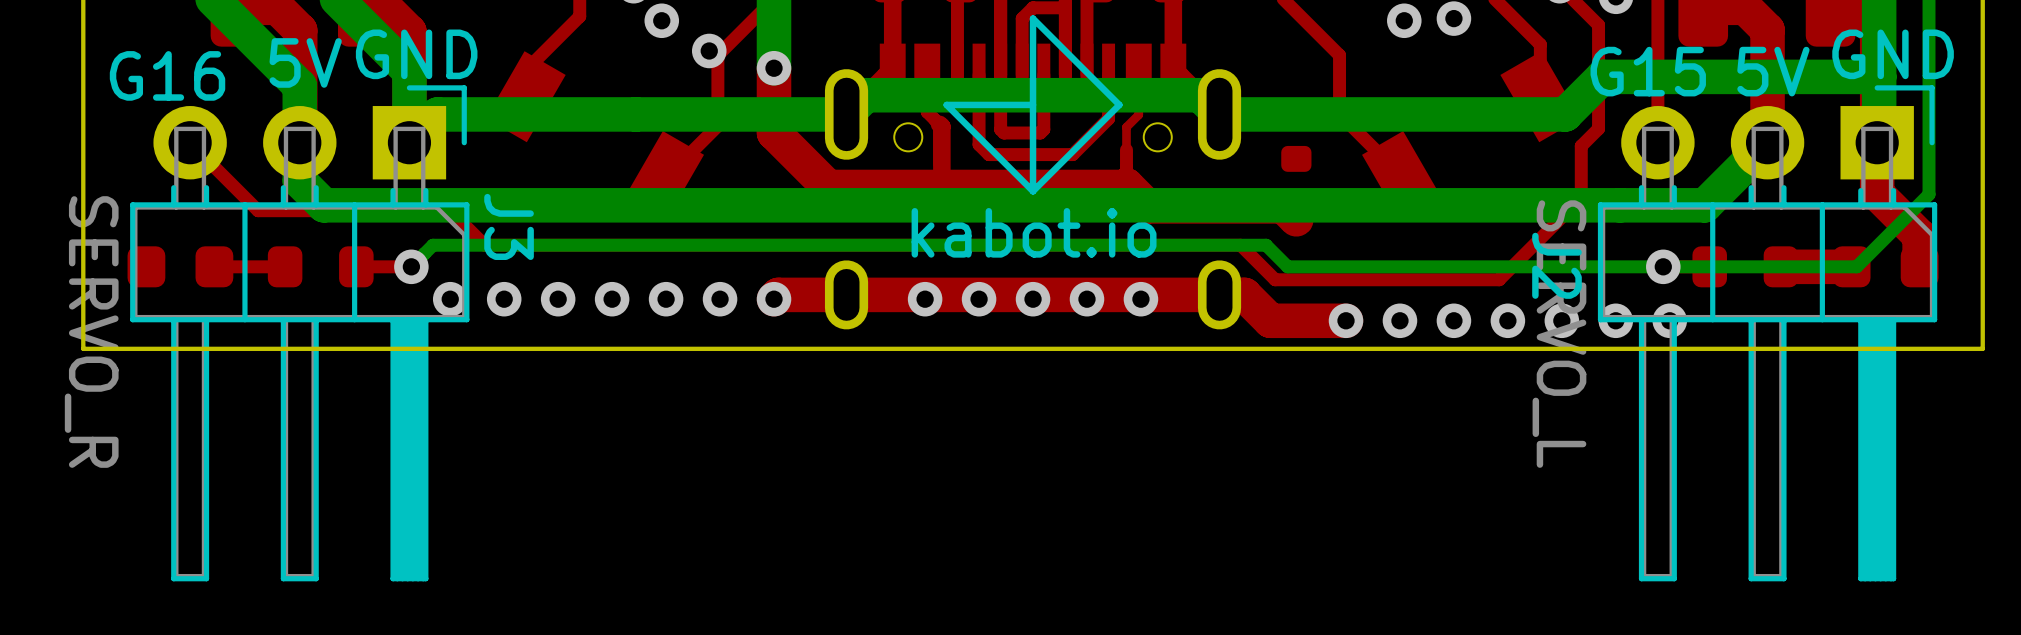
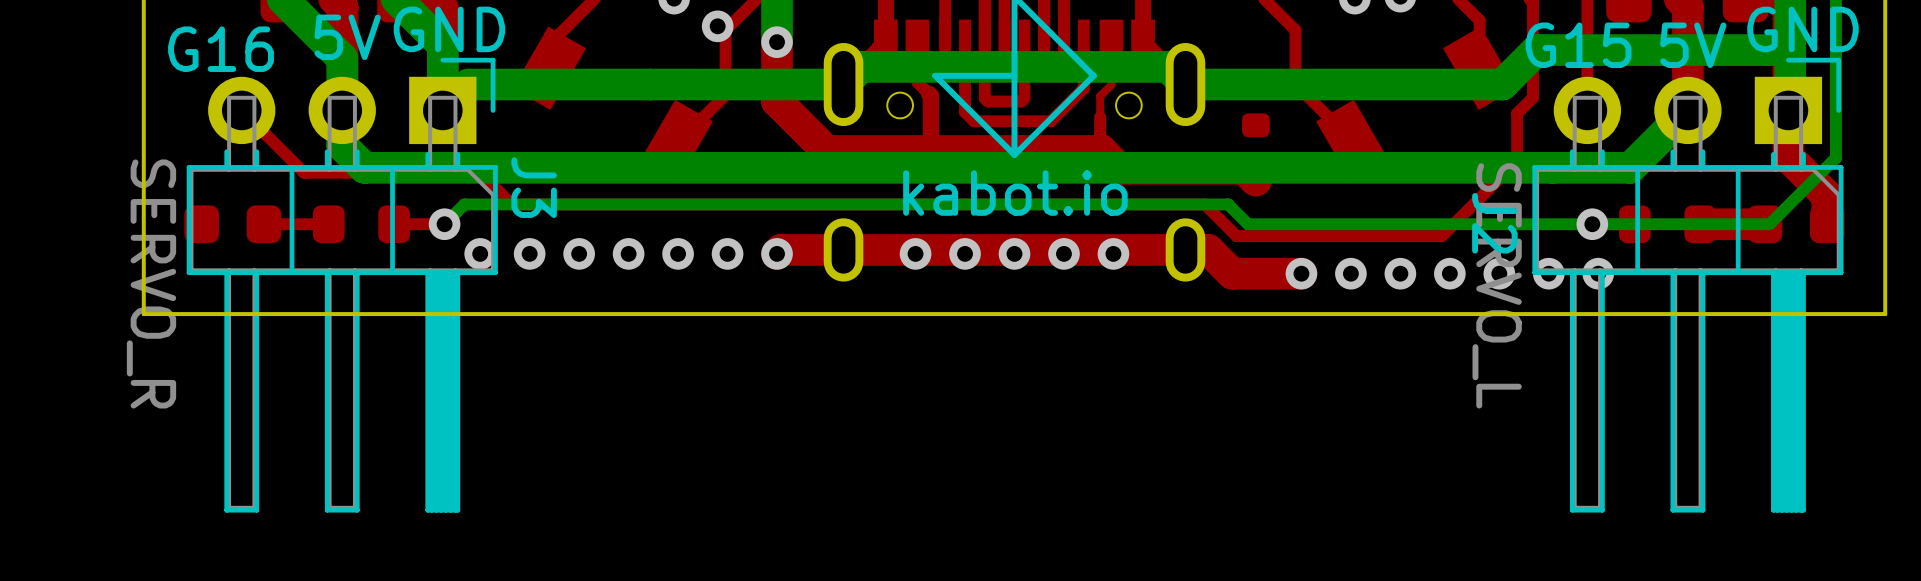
board edge: (1982, 348) (83, 348) -> (1885, 299) (1885, 314) (143, 314) (143, 299)

